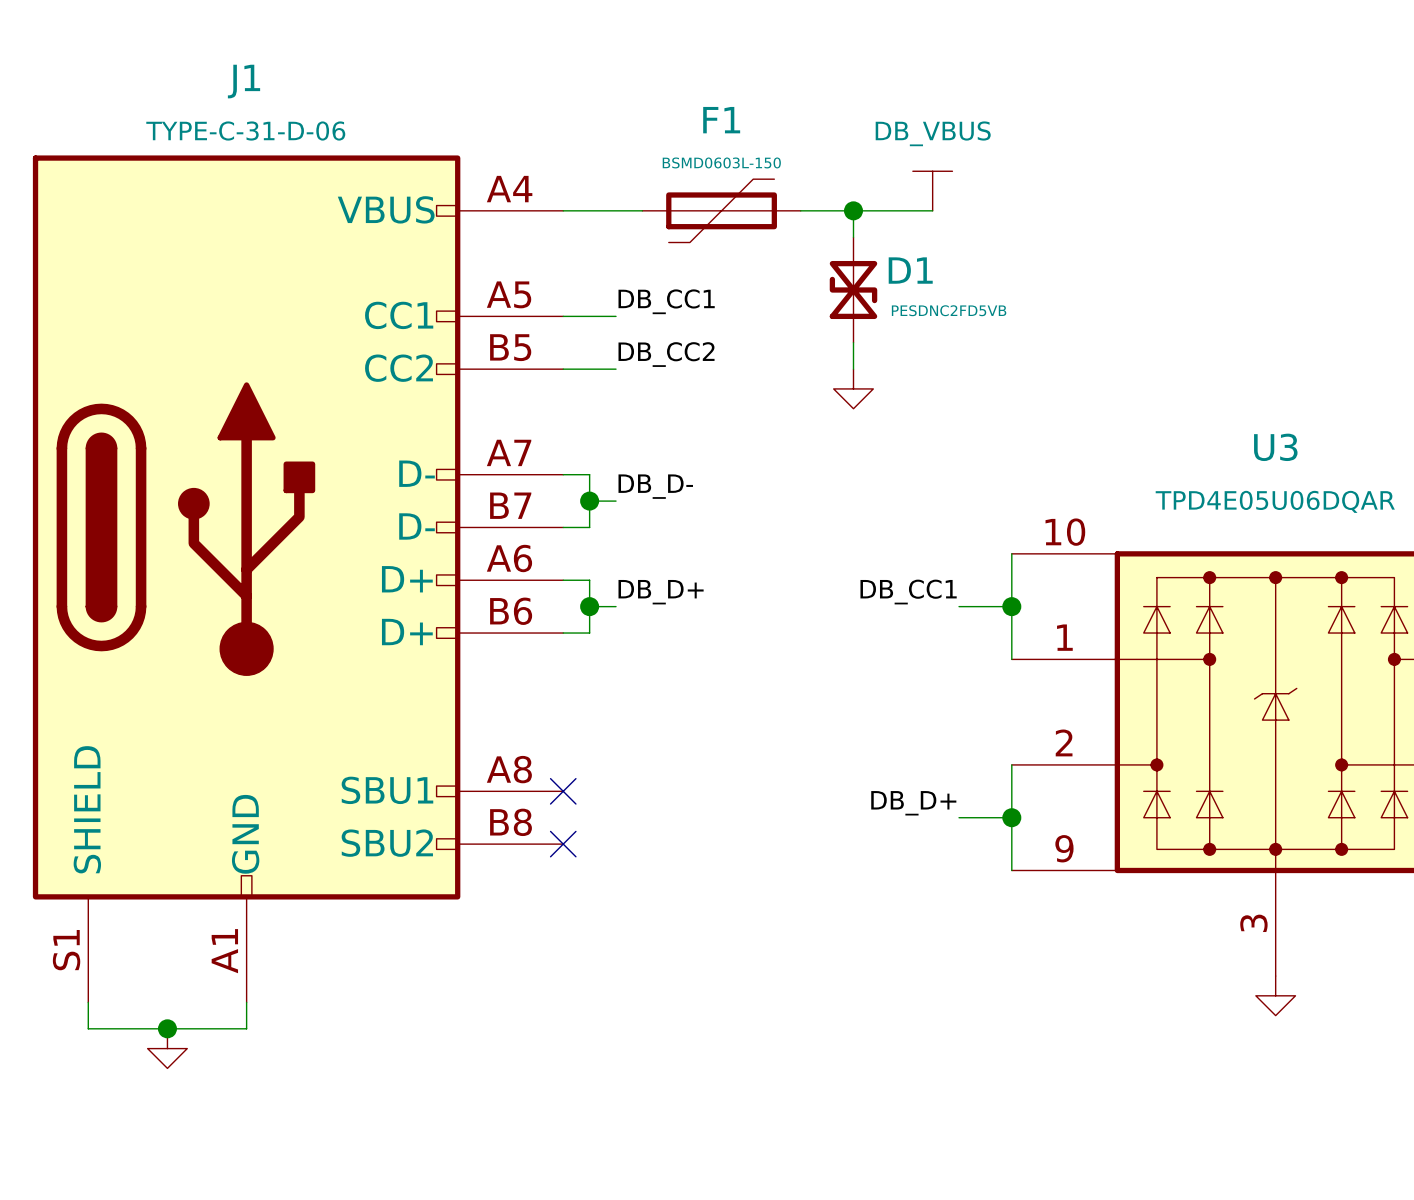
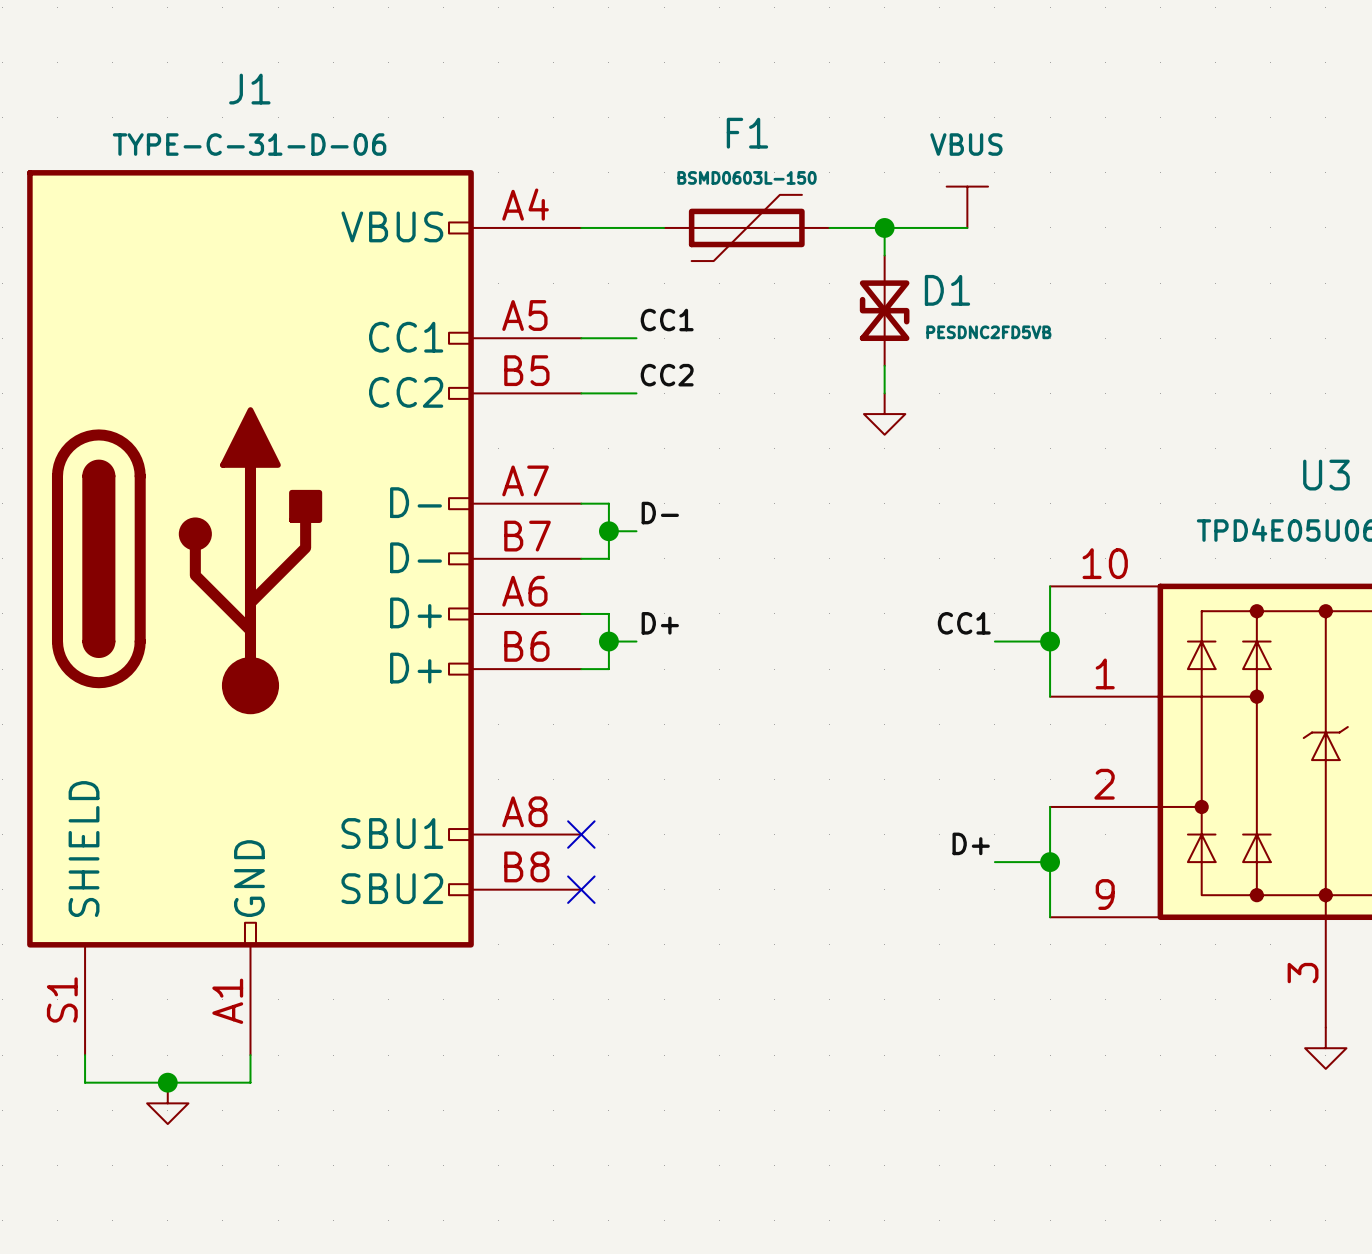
power symbol: DB_VBUS (932, 191) -> VBUS (967, 207)
label: DB_CC1 (666, 301) -> CC1 (667, 320)
label: DB_CC2 (666, 354) -> CC2 (667, 375)
label: DB_D- (655, 486) -> D- (660, 513)
label: DB_D+ (661, 592) -> D+ (660, 623)
label: DB_CC1 (908, 592) -> CC1 (964, 623)
label: DB_D+ (913, 803) -> D+ (971, 843)

